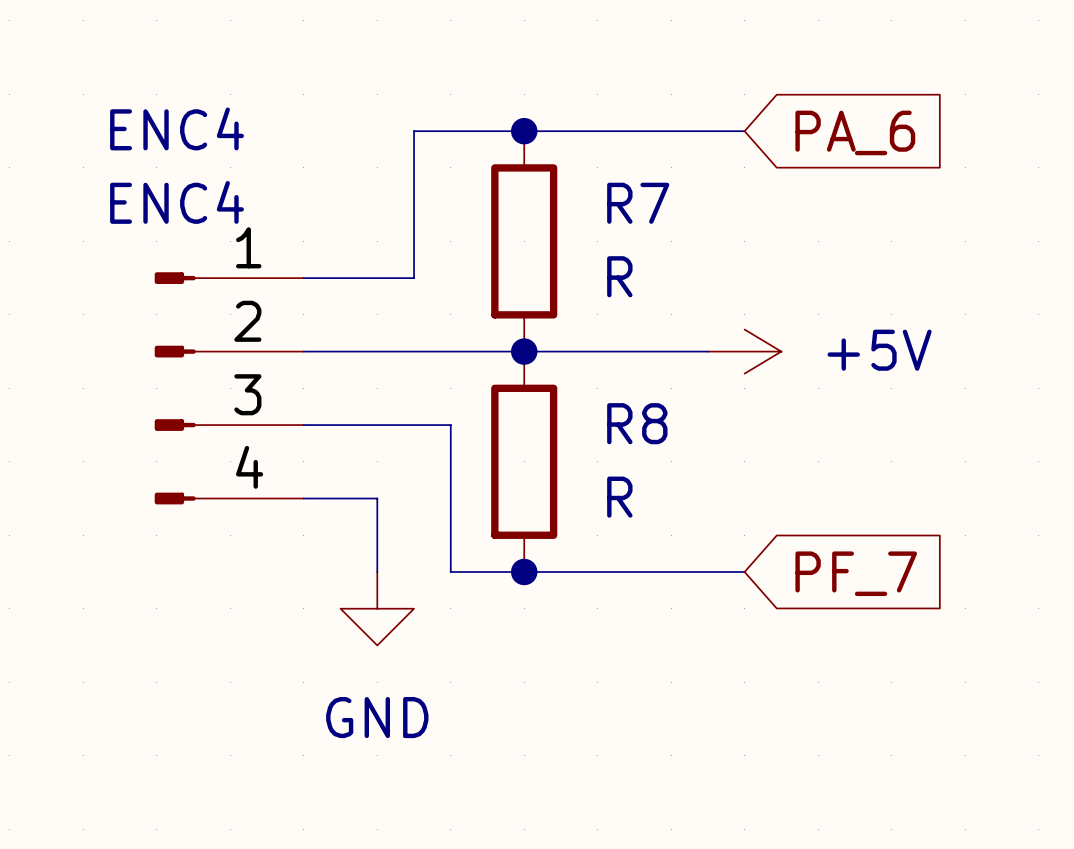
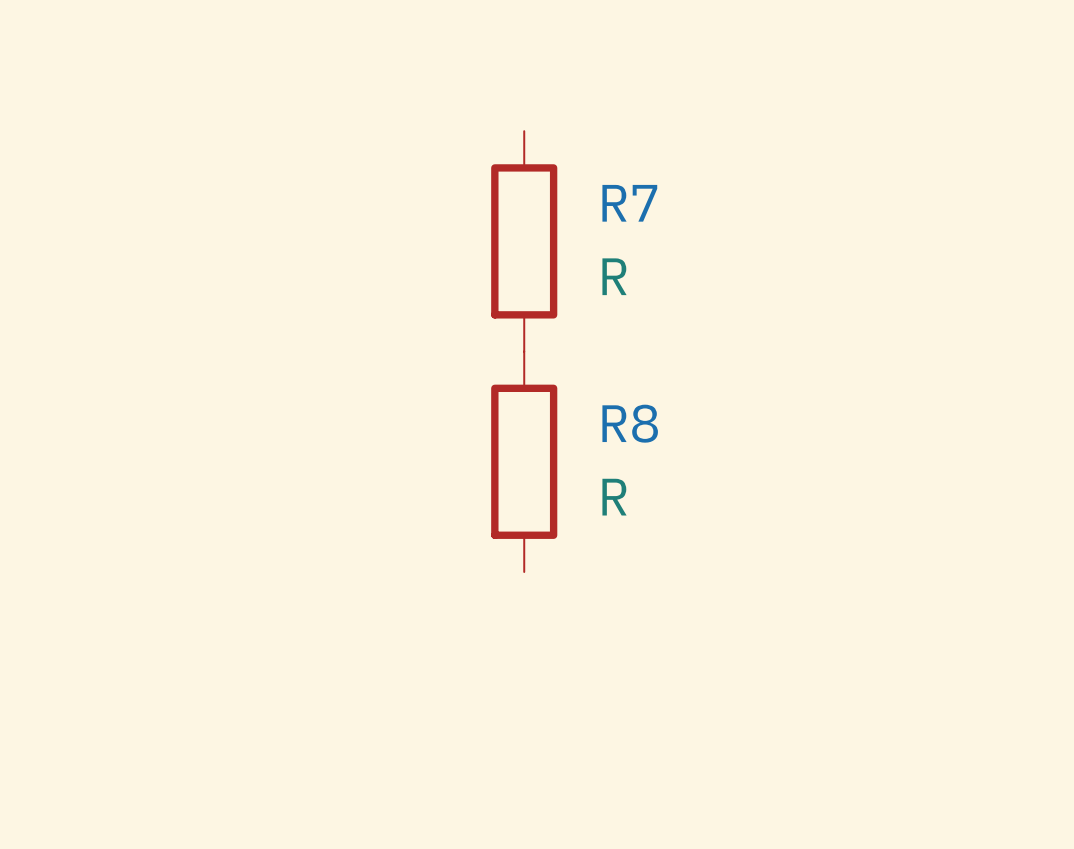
junction: (524, 131) -> none
wire: (744, 131) (414, 131) (414, 278) (303, 278) -> none
global label: PA_6 (855, 132) -> none
wire: (303, 351) (707, 351) -> none
junction: (524, 351) -> none
power symbol: +5V (744, 351) -> none
ENC4: ENC4 (229, 388) -> none
wire: (303, 425) (450, 425) (450, 571) (744, 571) -> none
wire: (303, 498) (377, 498) (377, 571) -> none
junction: (524, 571) -> none
global label: PF_7 (856, 573) -> none
power symbol: GND (377, 608) -> none

